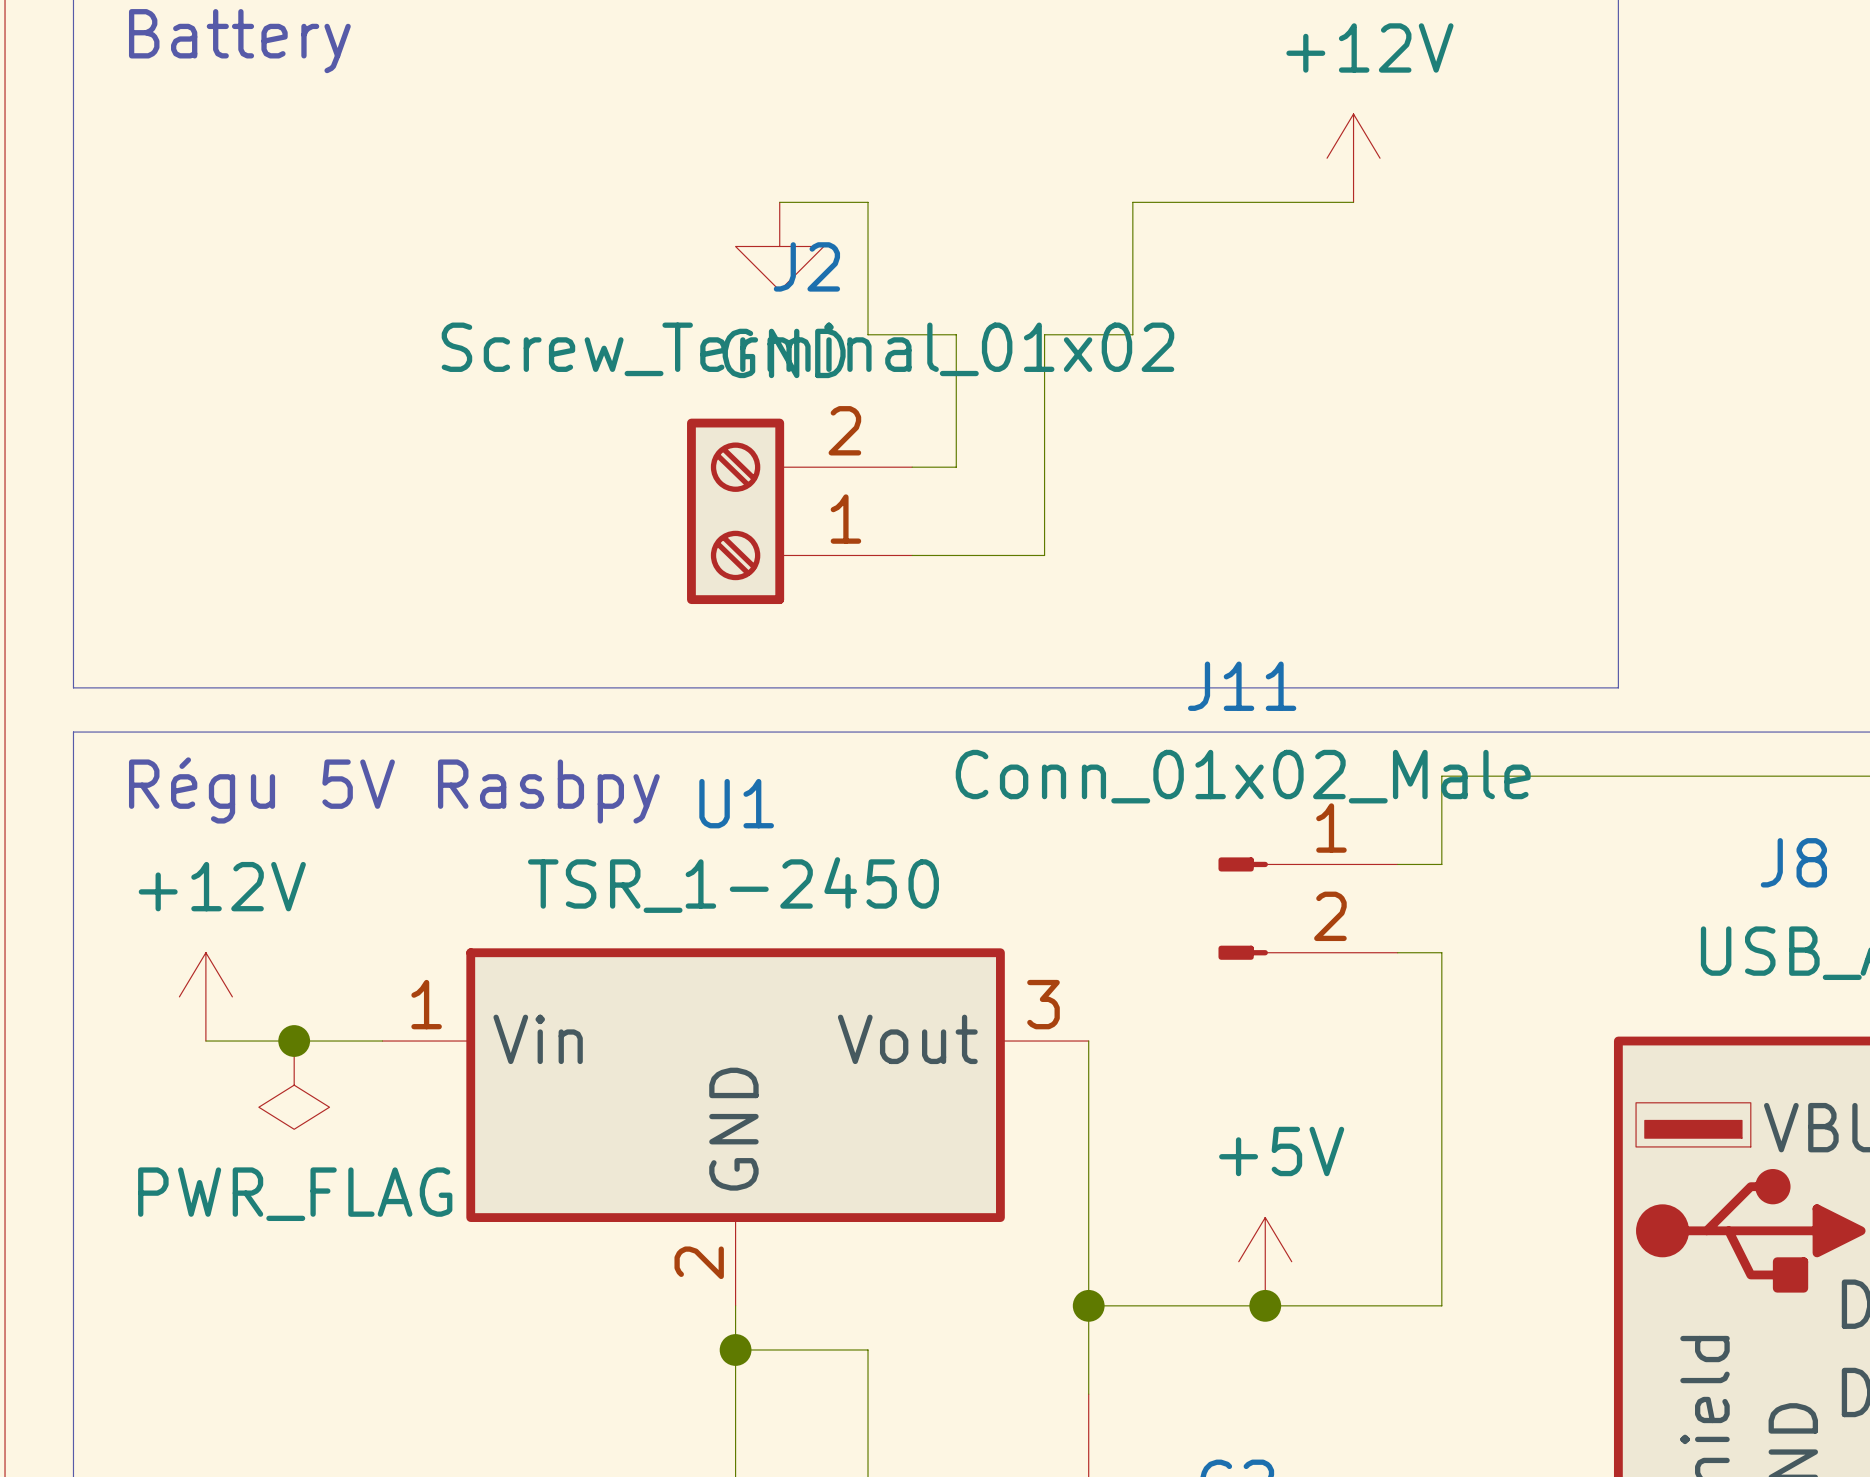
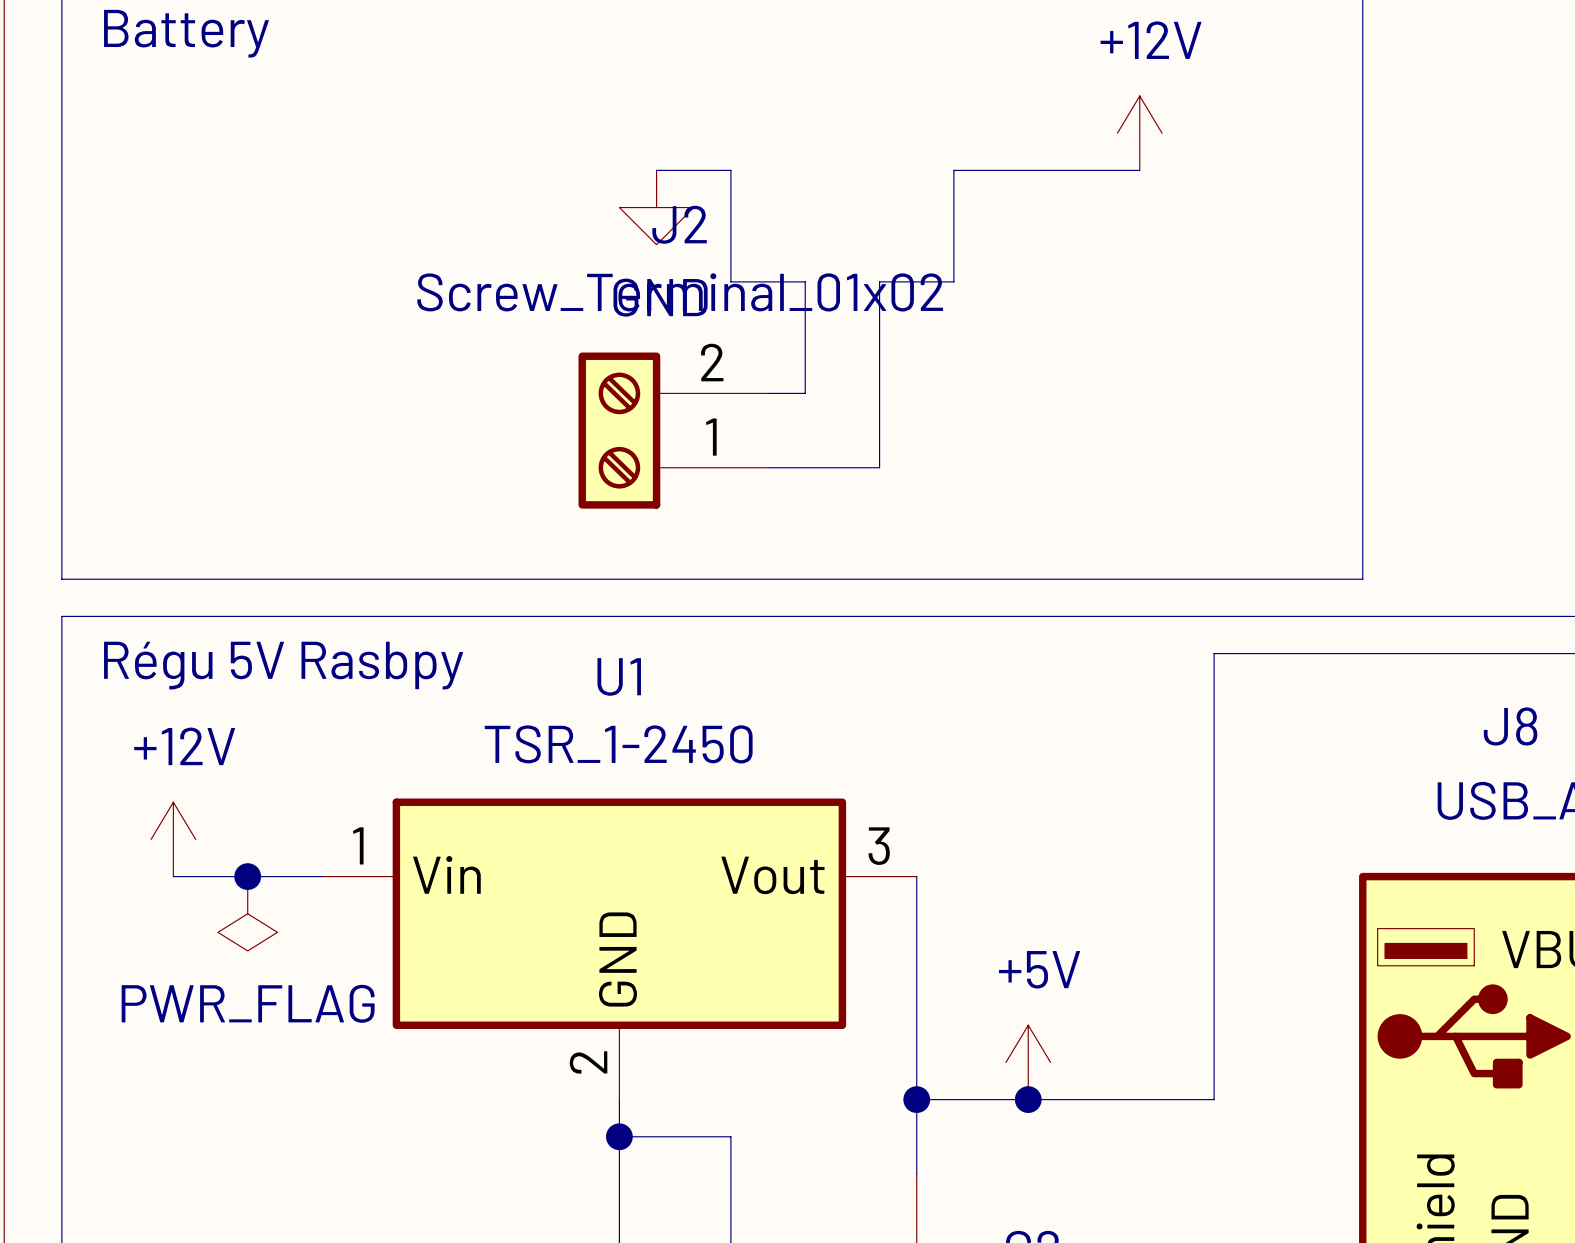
wire: (1397, 864) (1441, 864) -> (1214, 802) (1214, 727)
J11: Conn_01x02_Male (1308, 908) -> none
wire: (1397, 952) (1441, 952) -> none
power symbol position: +5V (1265, 1261) -> +5V (1028, 1062)
junction position: (1265, 1305) -> (1028, 1099)

